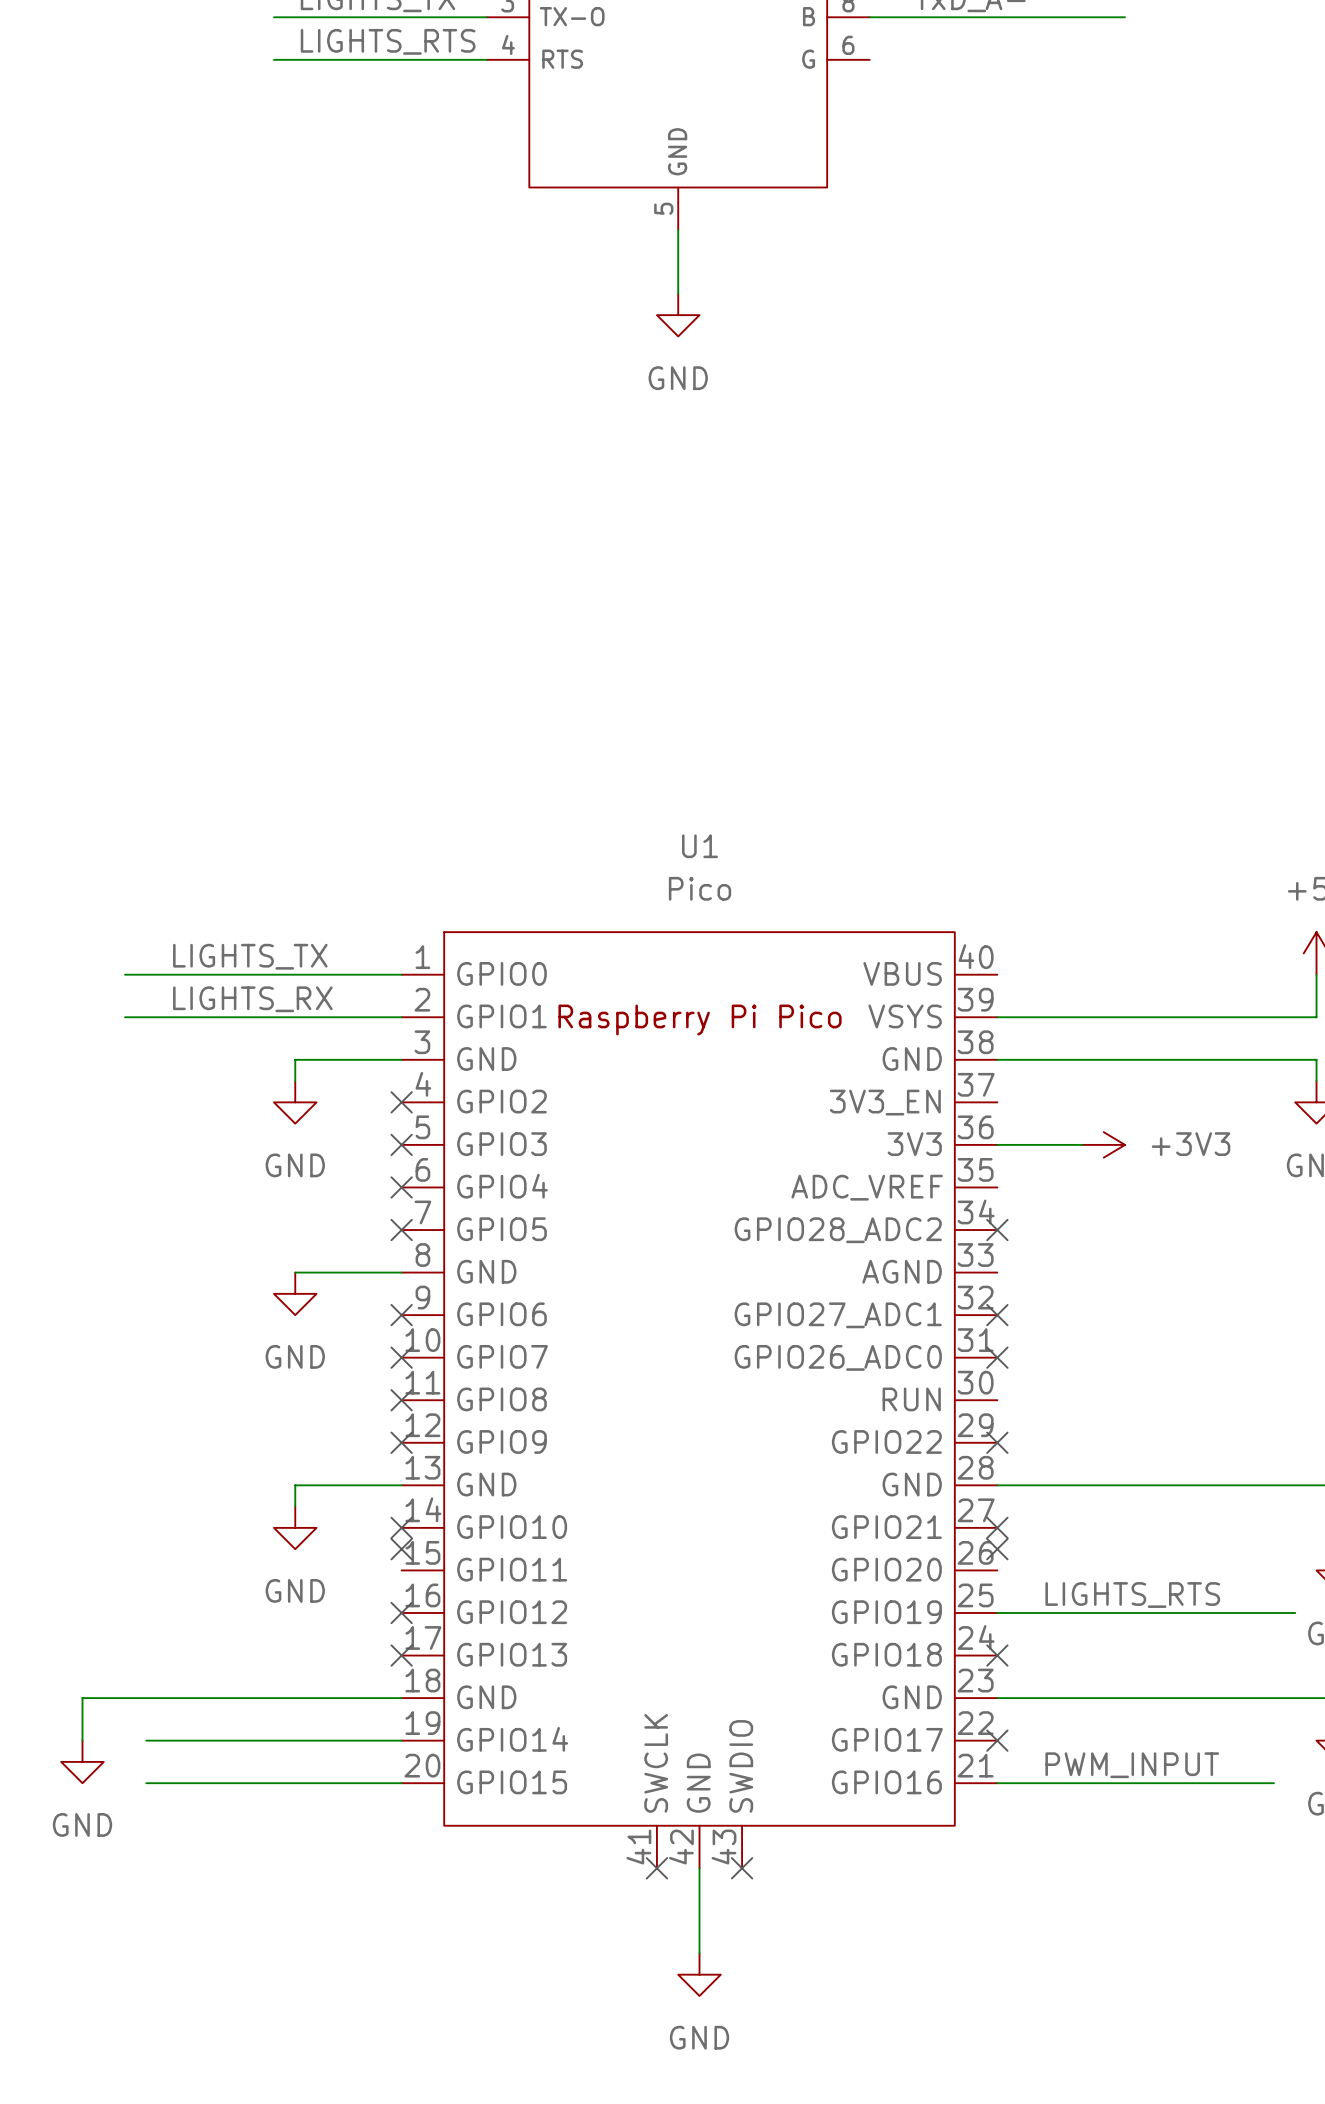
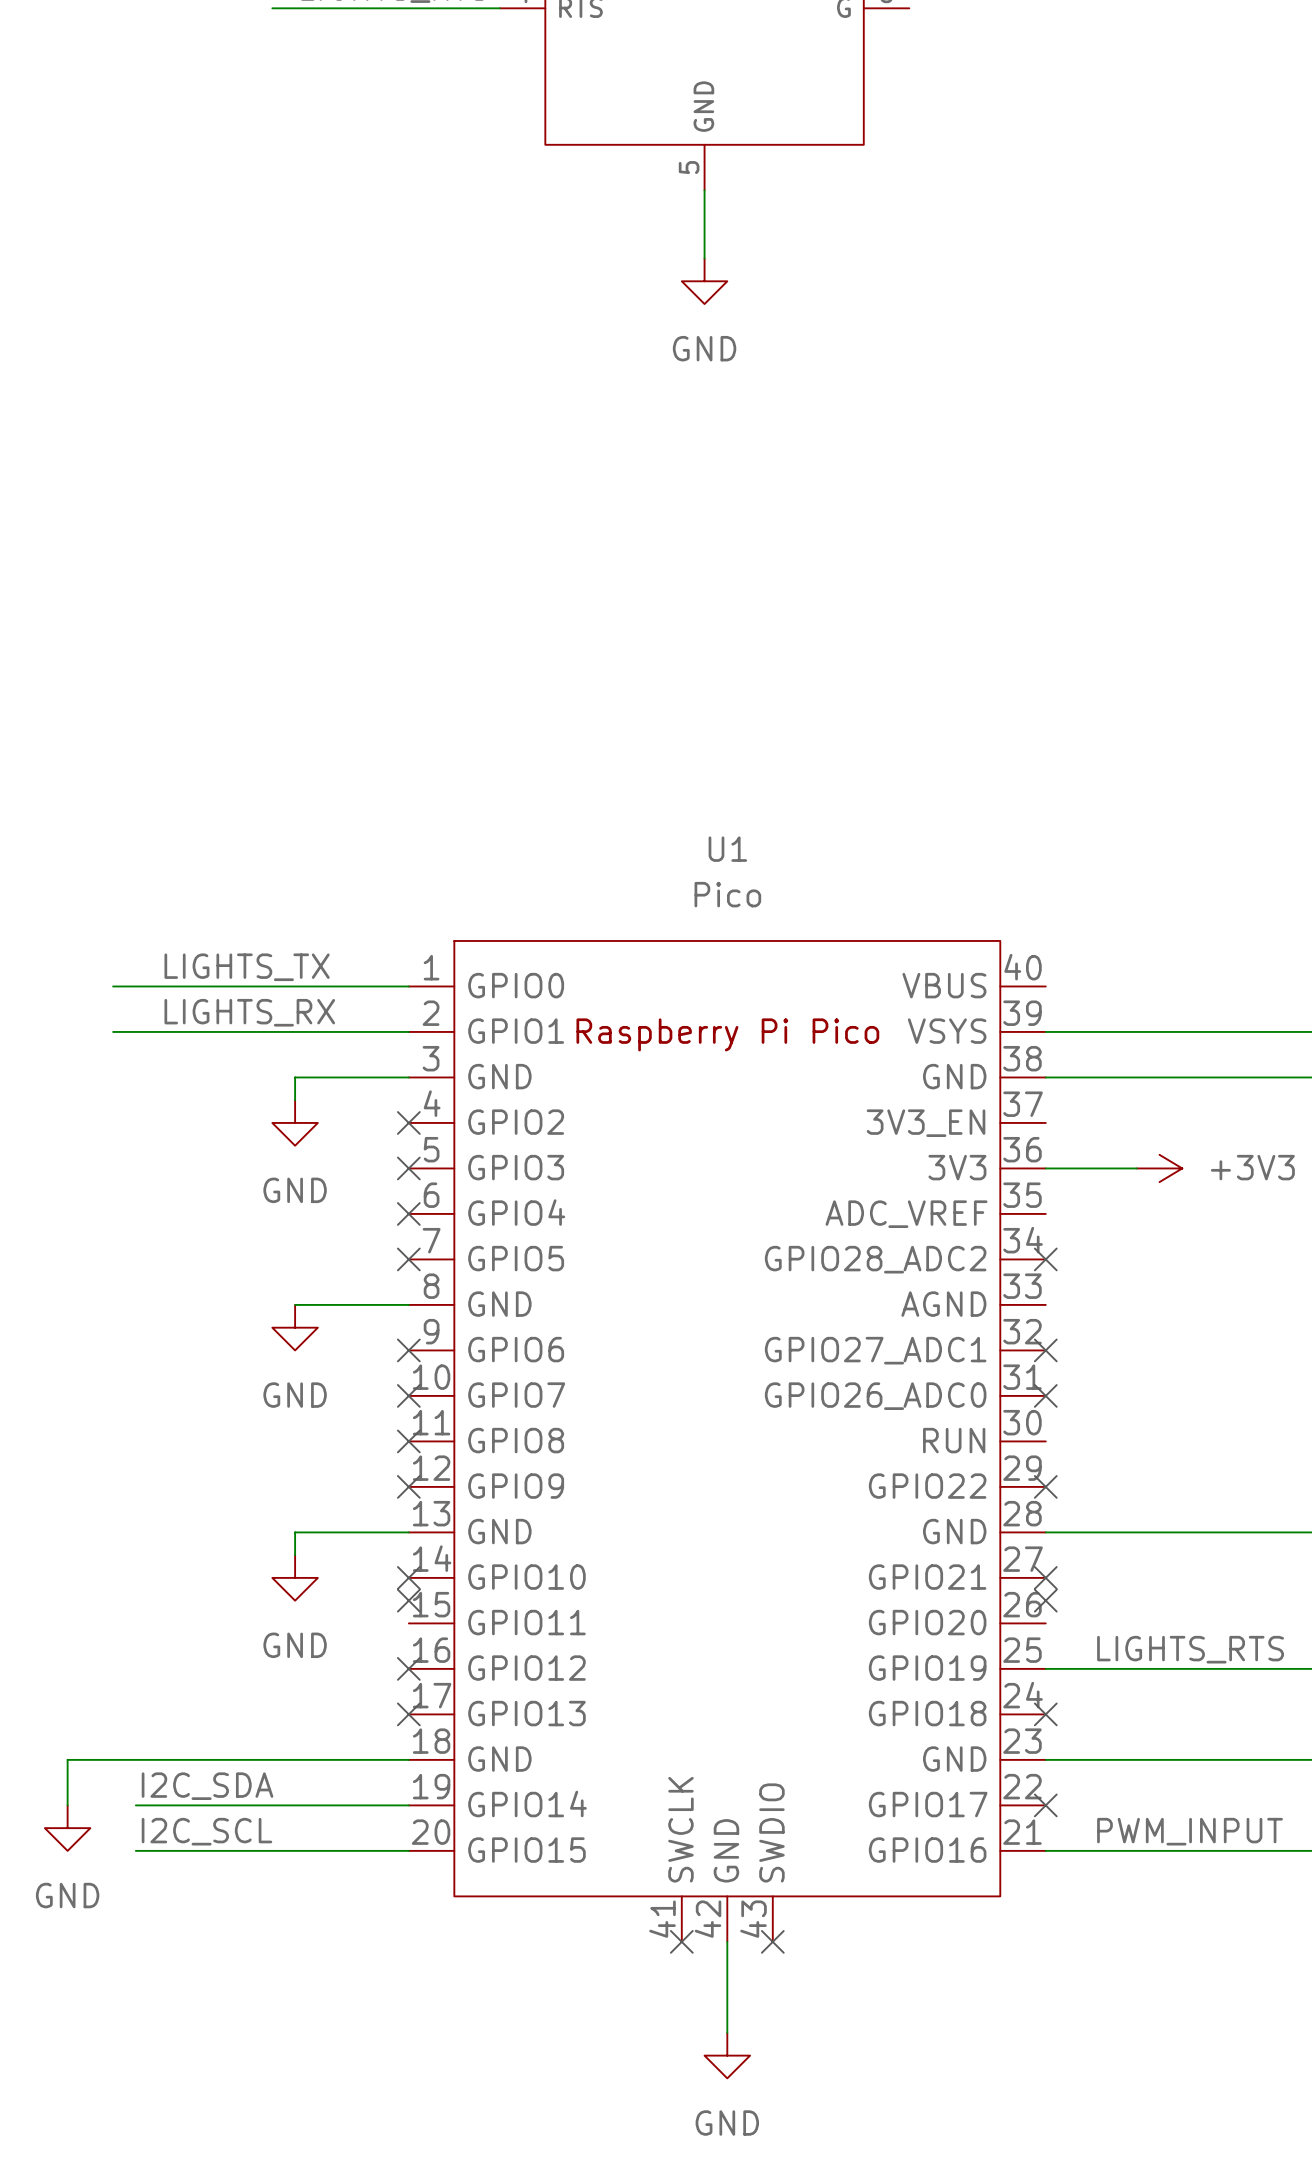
label: none -> I2C_SDA (207, 1786)
label: none -> I2C_SCL (206, 1831)

